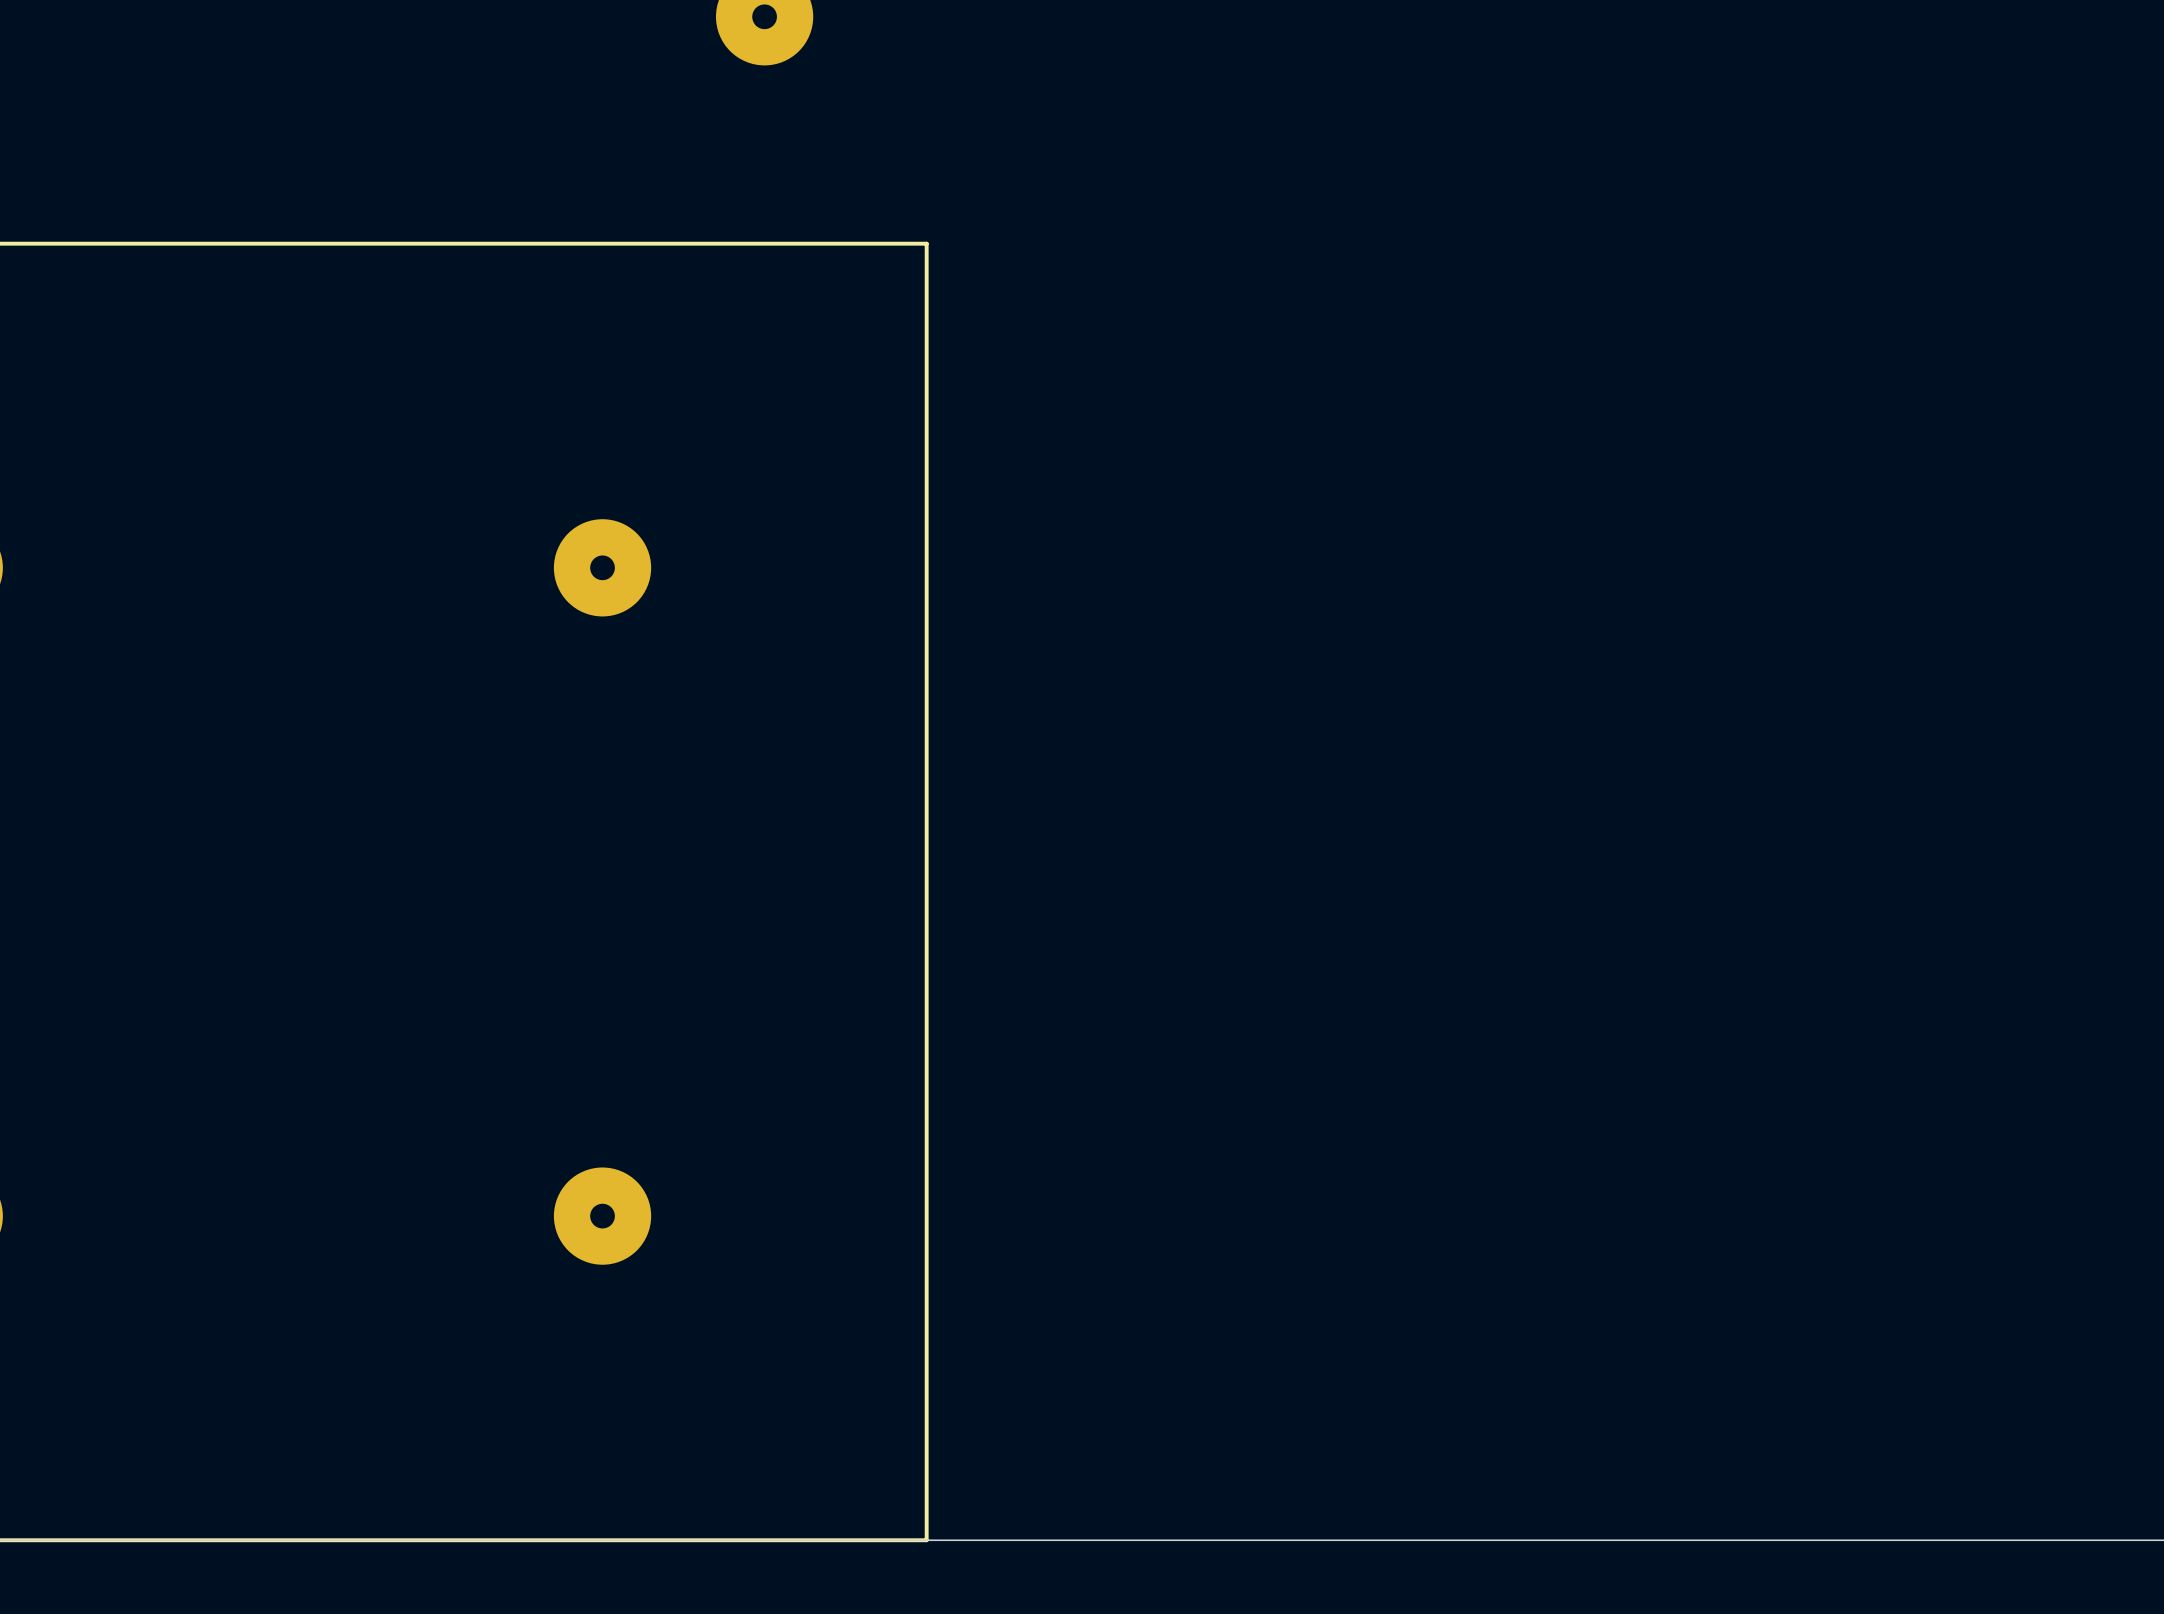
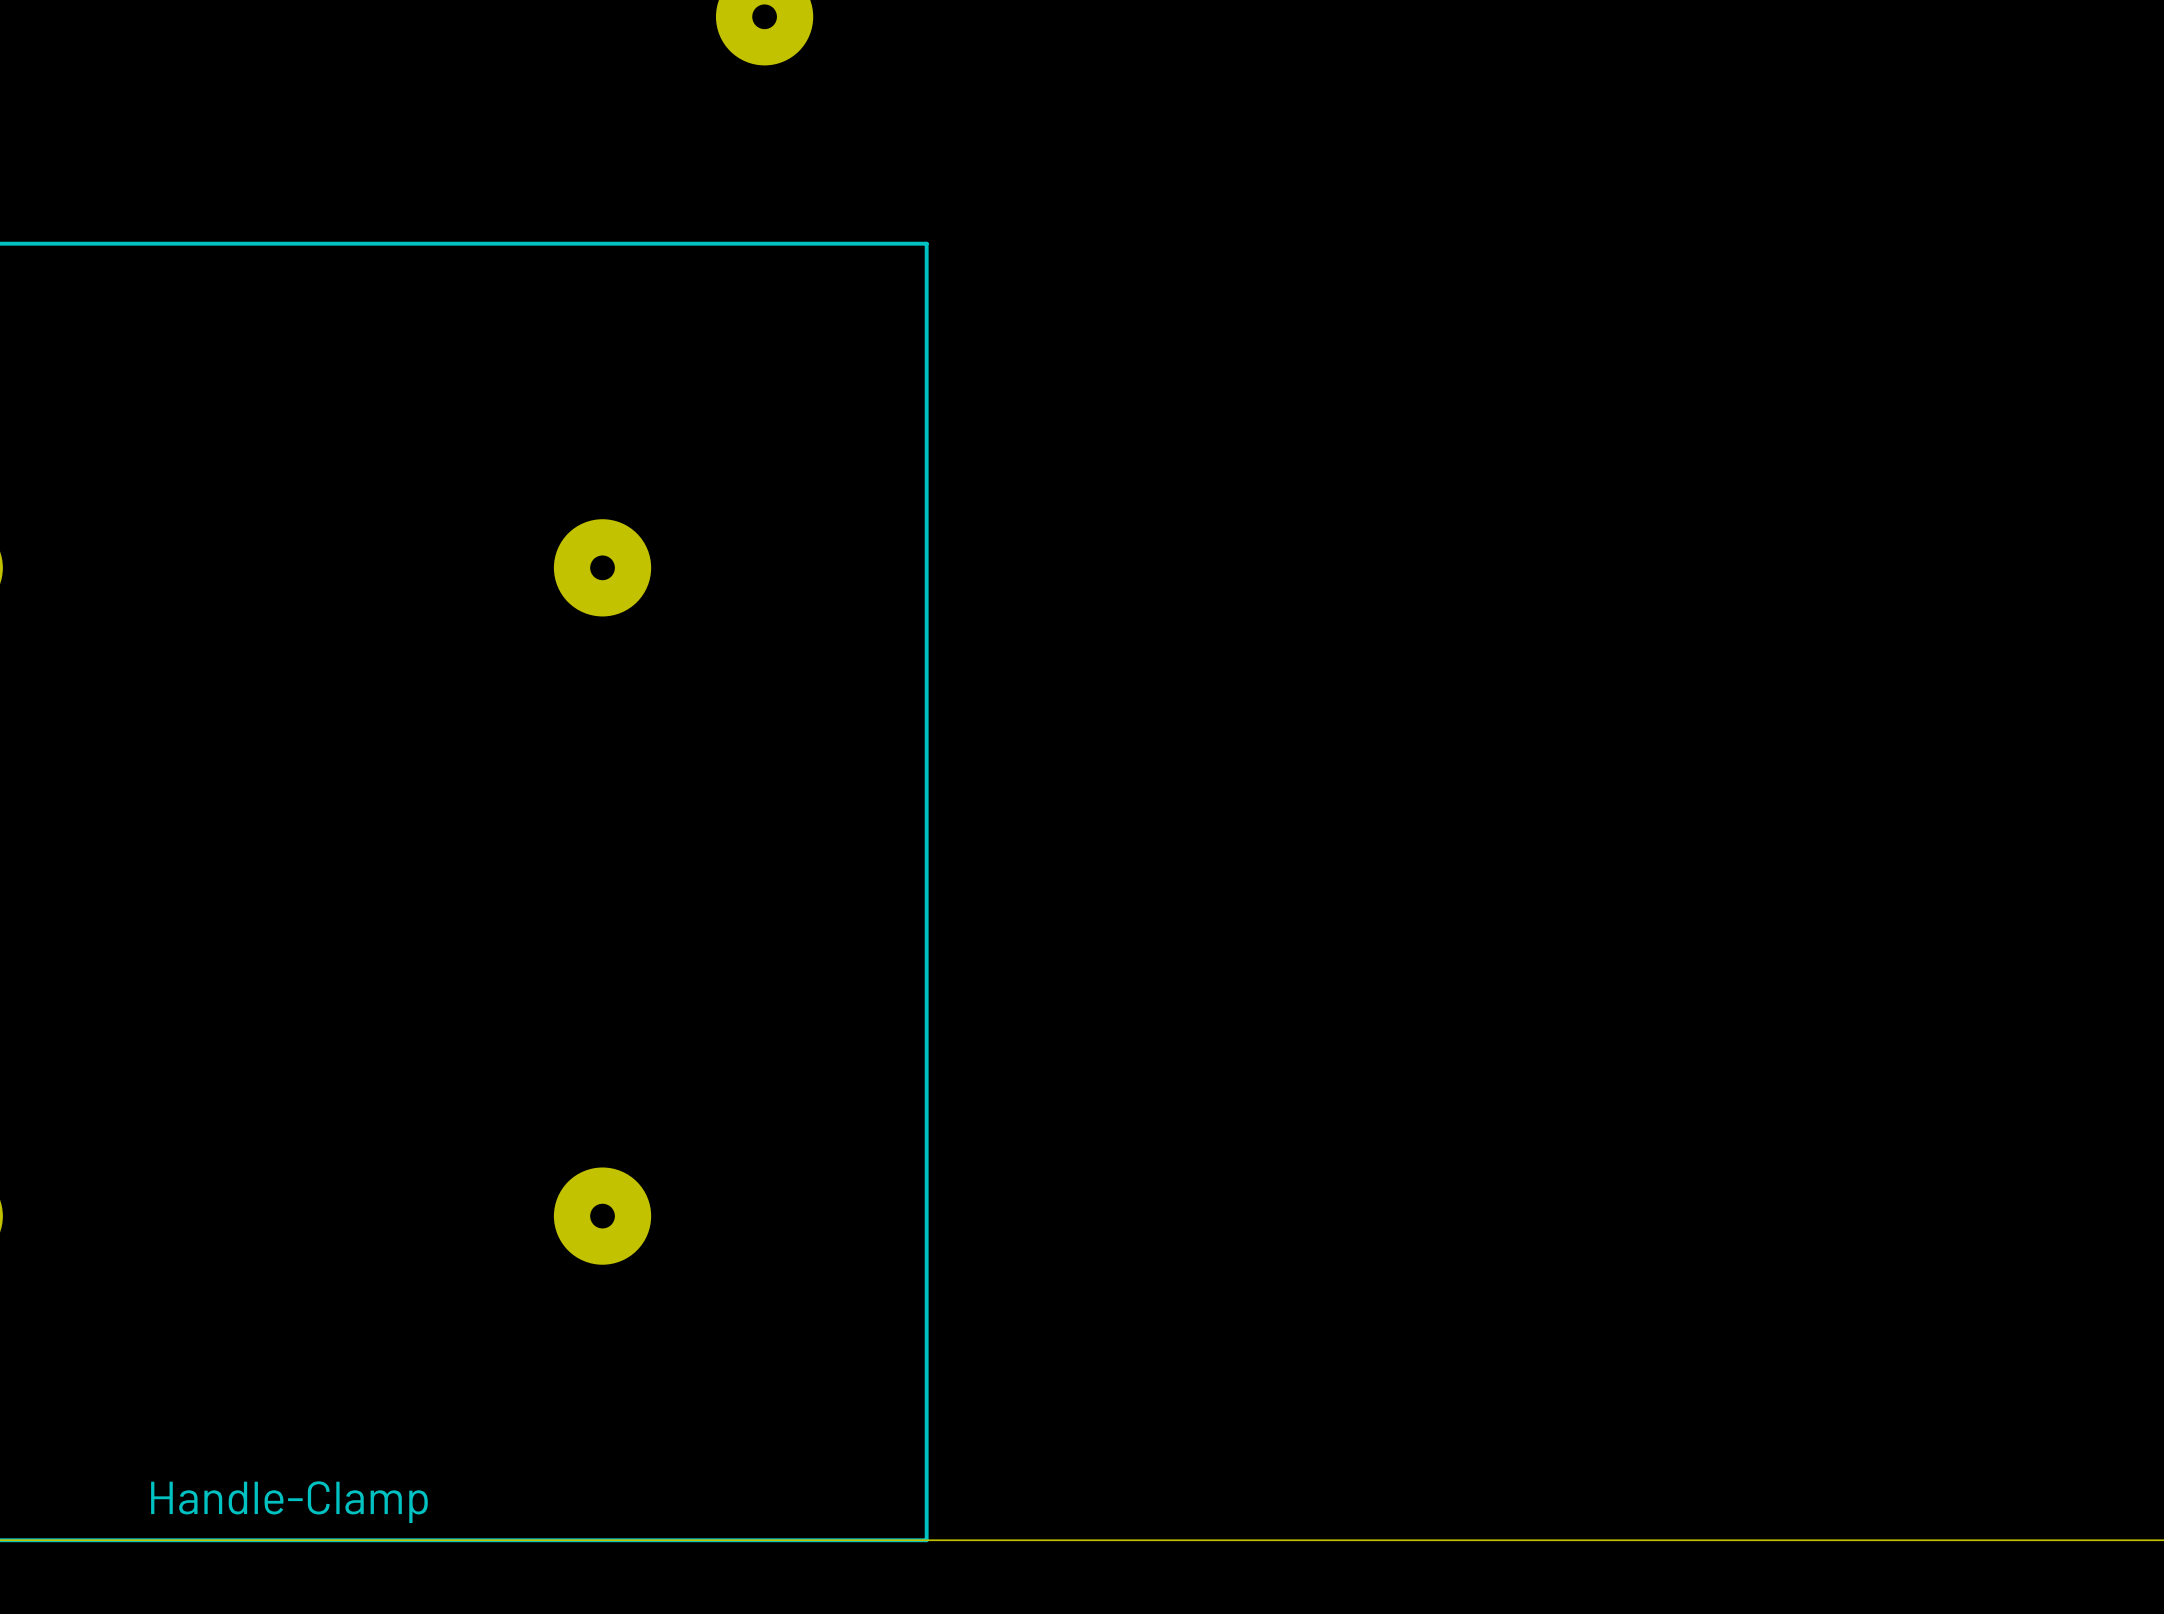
part value: none -> Handle-Clamp (289, 1502)

